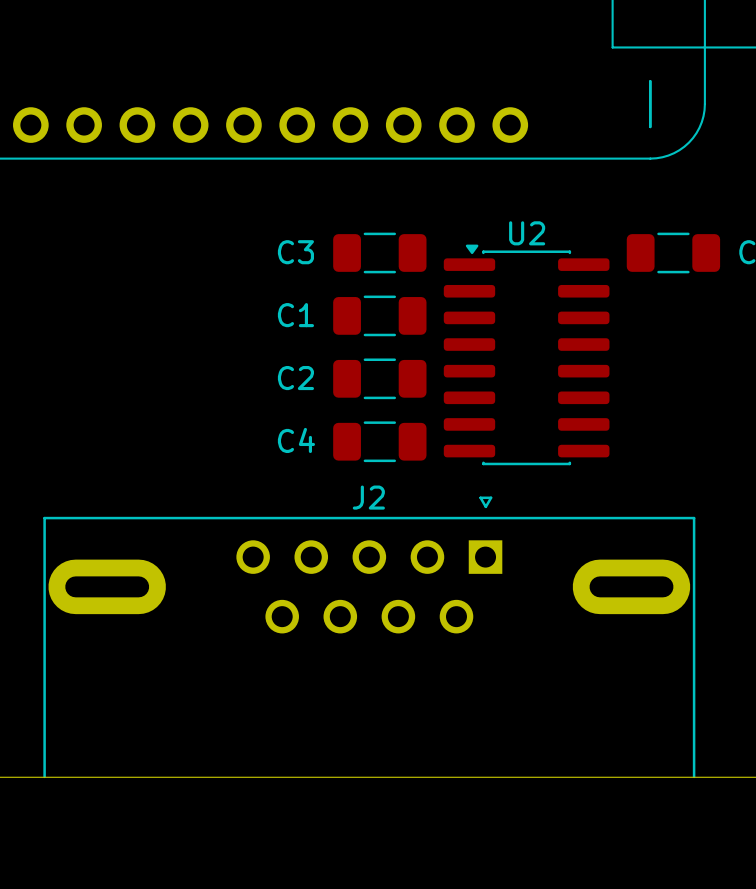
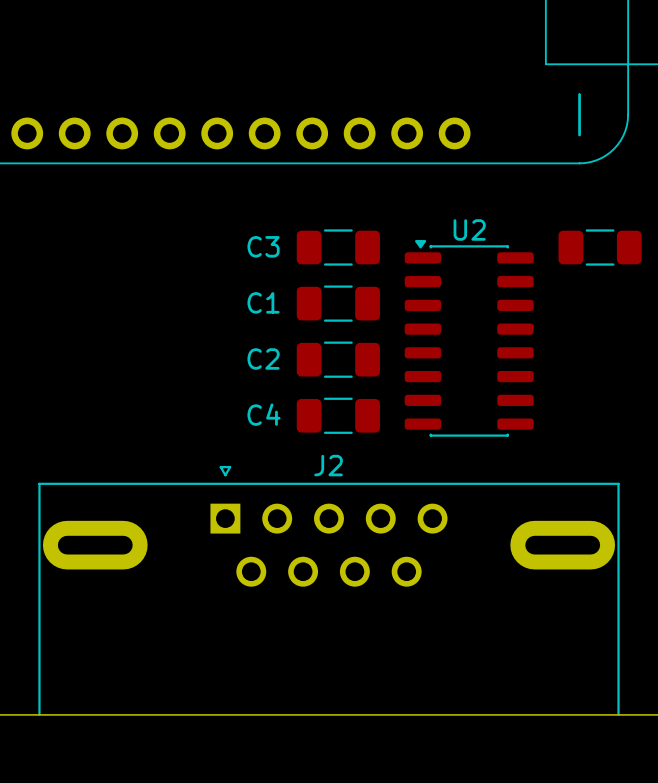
U2 footprint: [443, 244, 610, 466] -> [404, 240, 534, 437]
J2 footprint: [43, 496, 696, 779] -> [38, 465, 620, 716]

